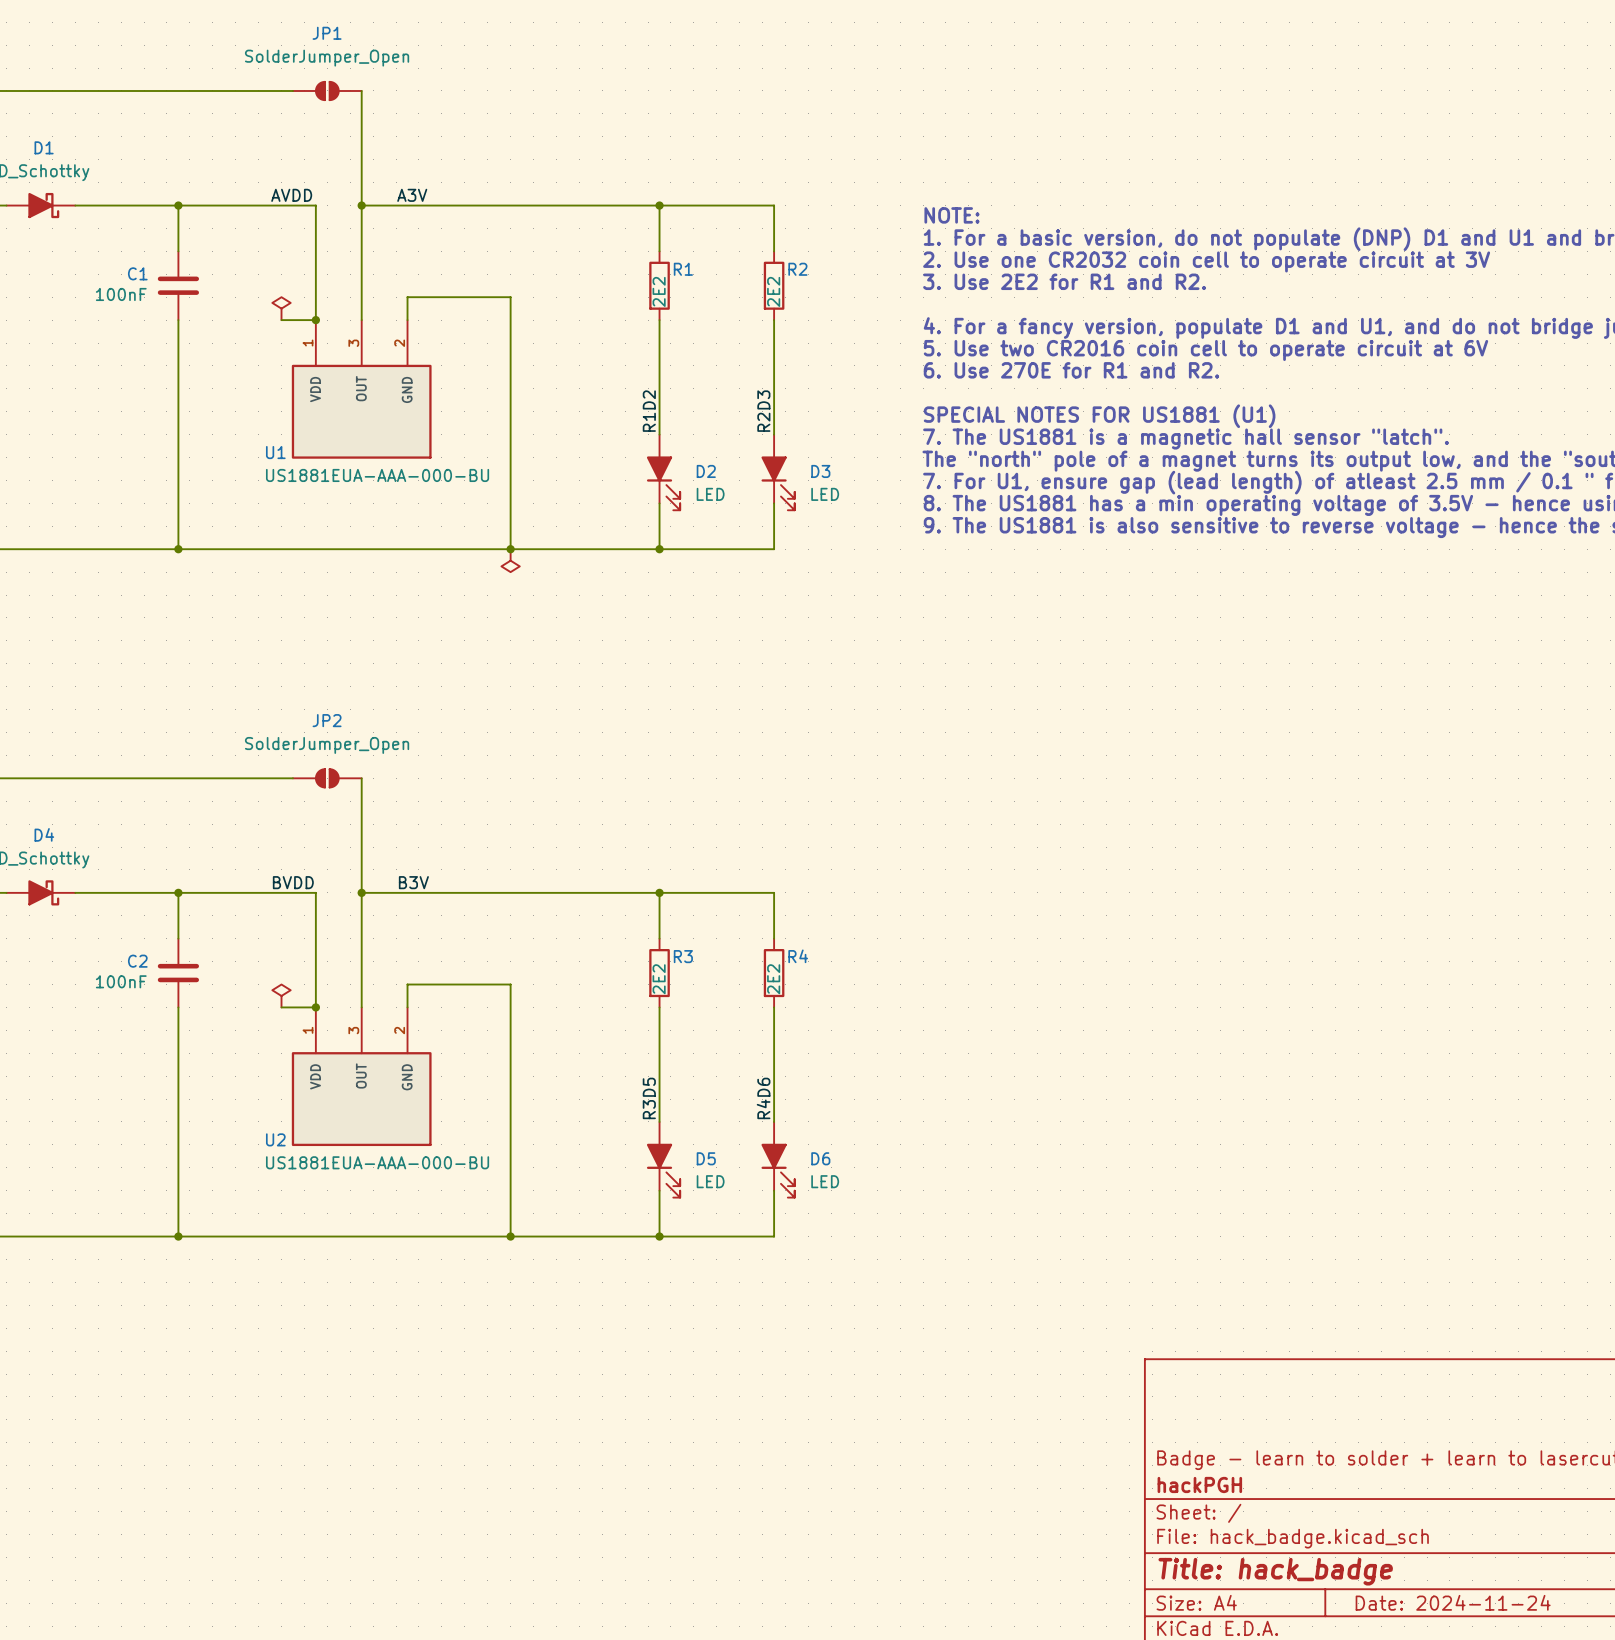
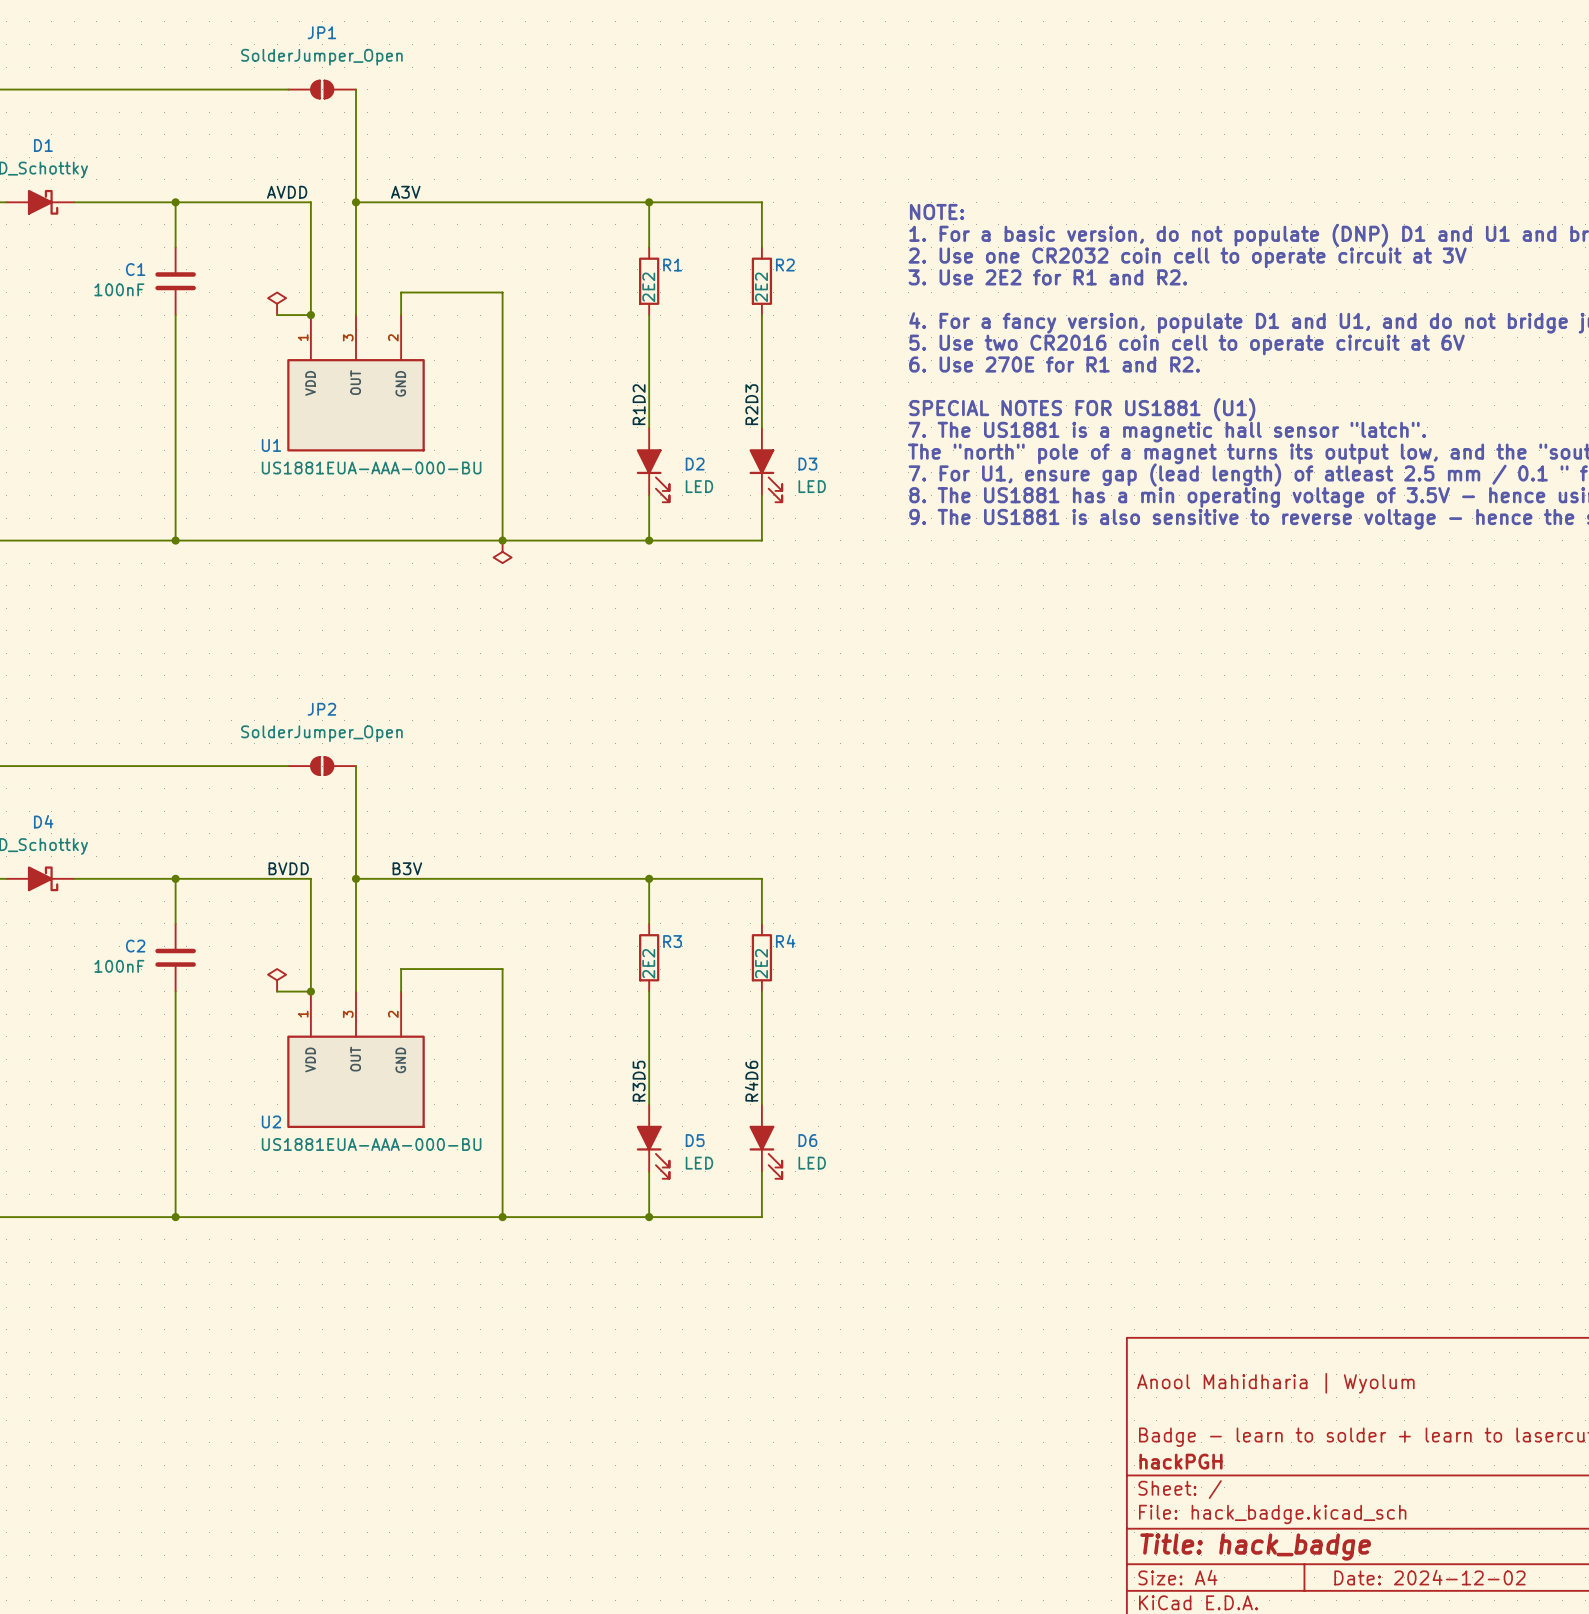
title block: none -> Anool Mahidharia | Wyolum (1275, 1383)
title block: Date: 2024-11-24 (1453, 1602) -> Date: 2024-12-02 (1429, 1577)

